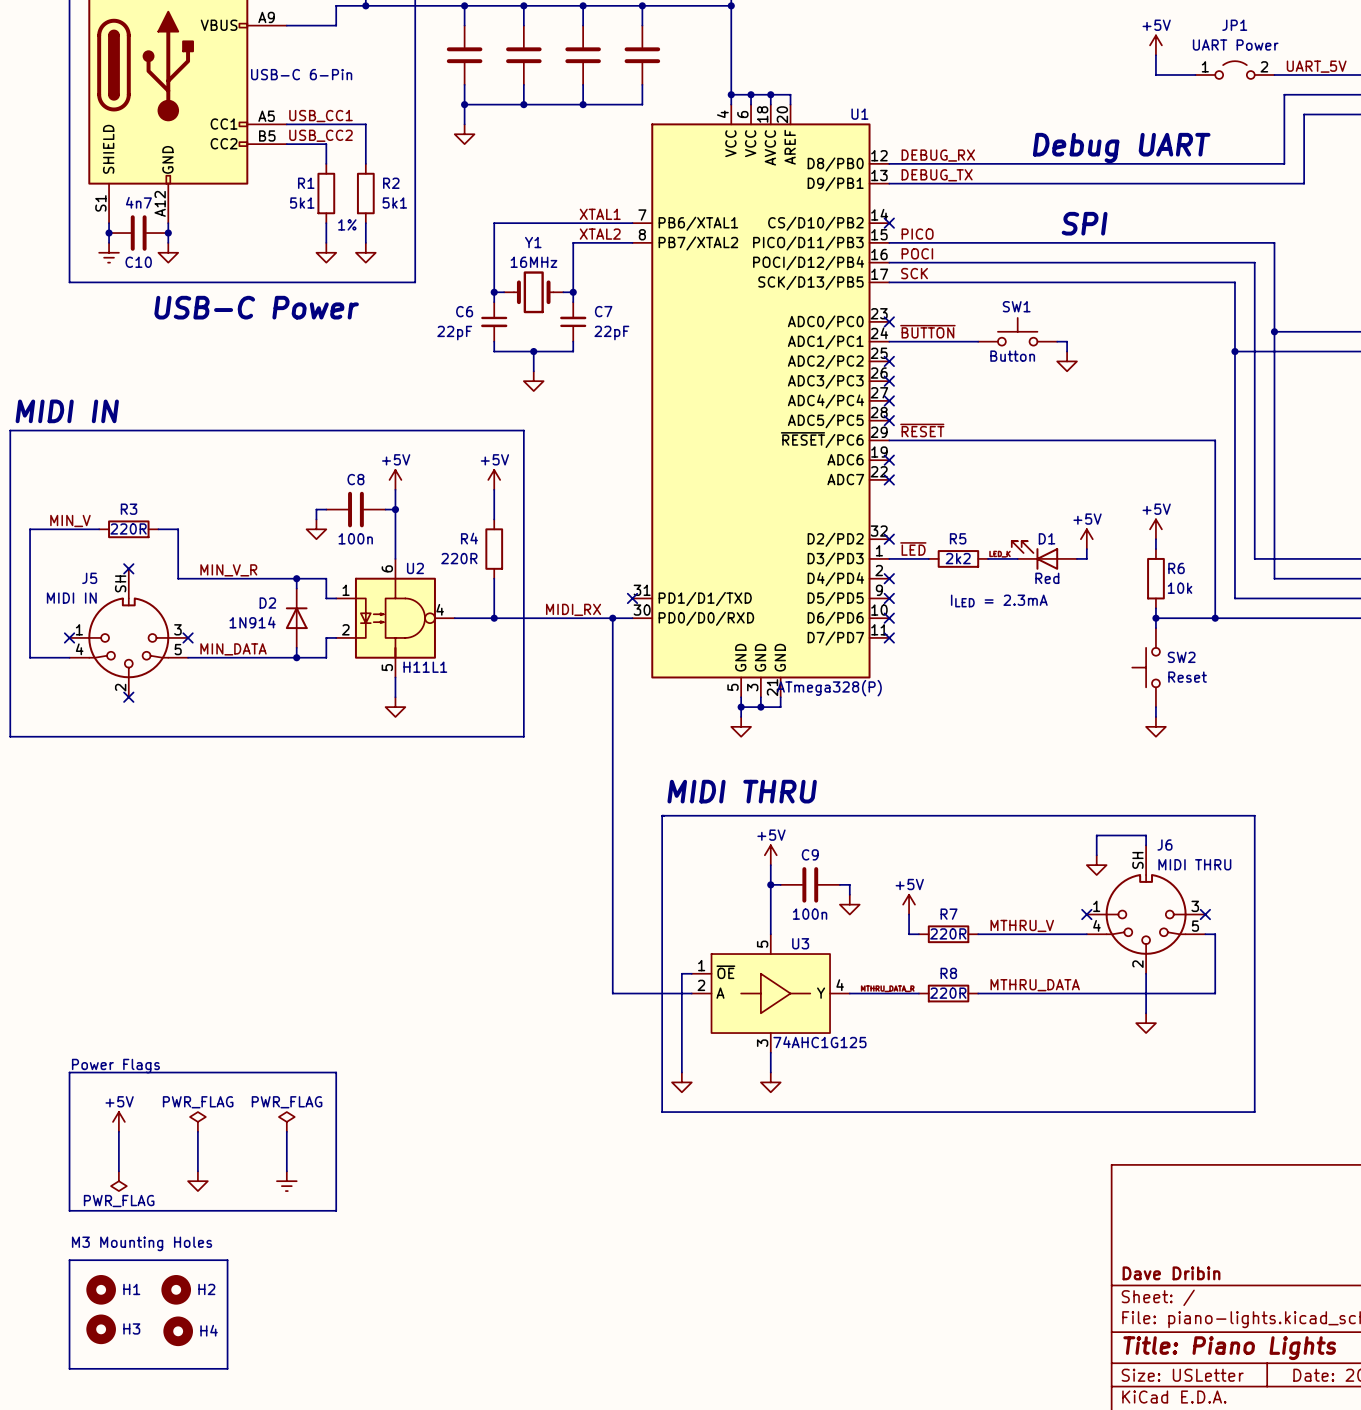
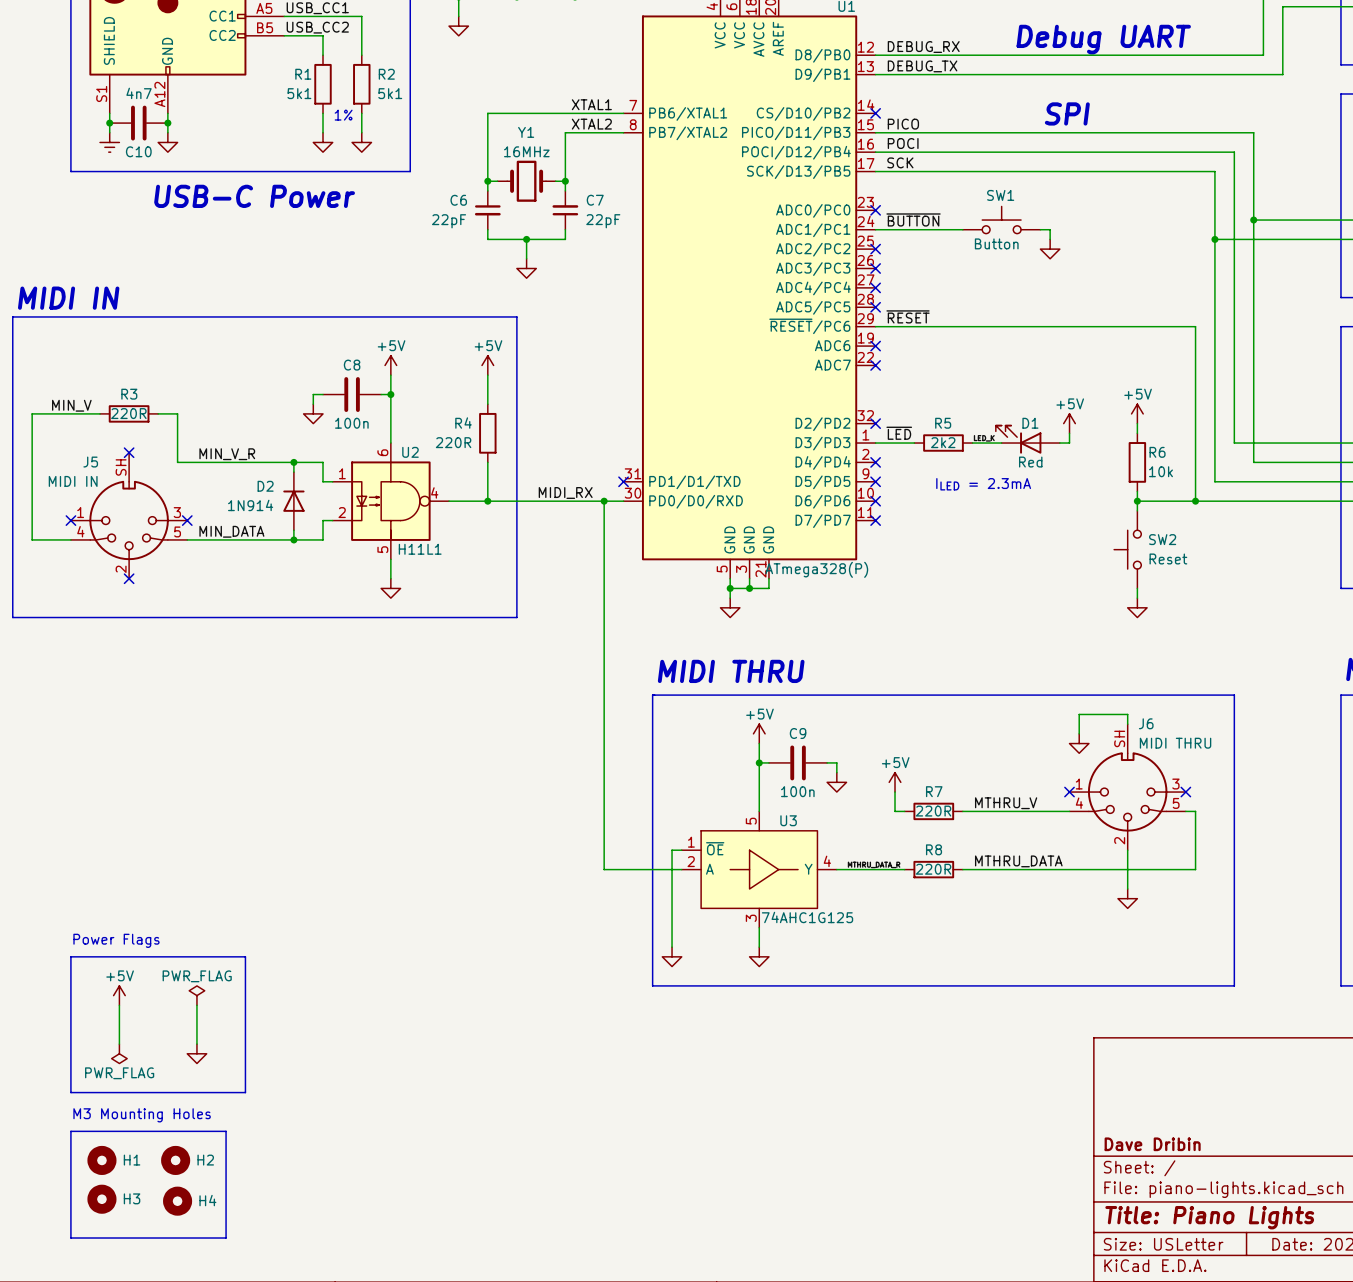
line: (69, 1082) (69, 1072) (336, 1072) (336, 1210) (69, 1210) -> (70, 956) (245, 956) (245, 1092) (70, 1092) (70, 1082)
power symbol: PWR_FLAG (286, 1121) -> none
wire: (286, 1131) (286, 1171) -> none
power symbol: (286, 1181) -> none

